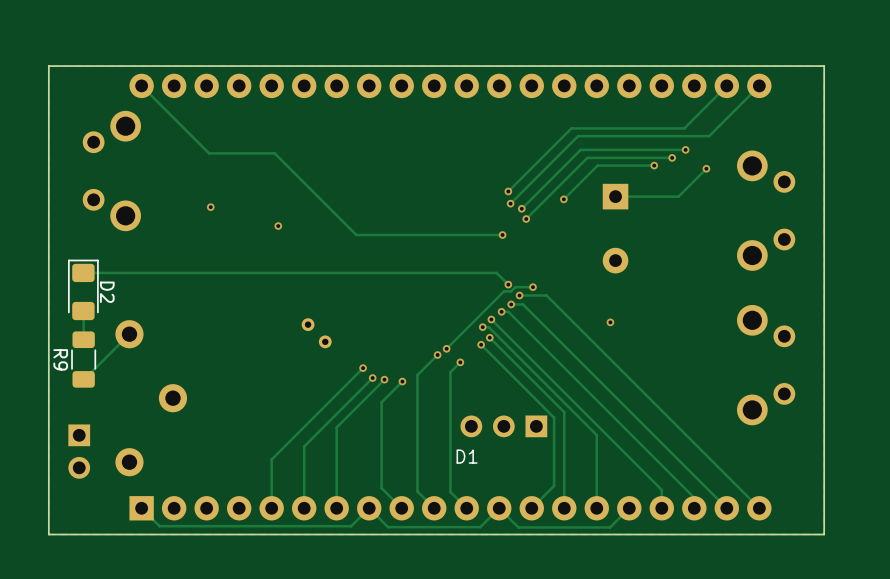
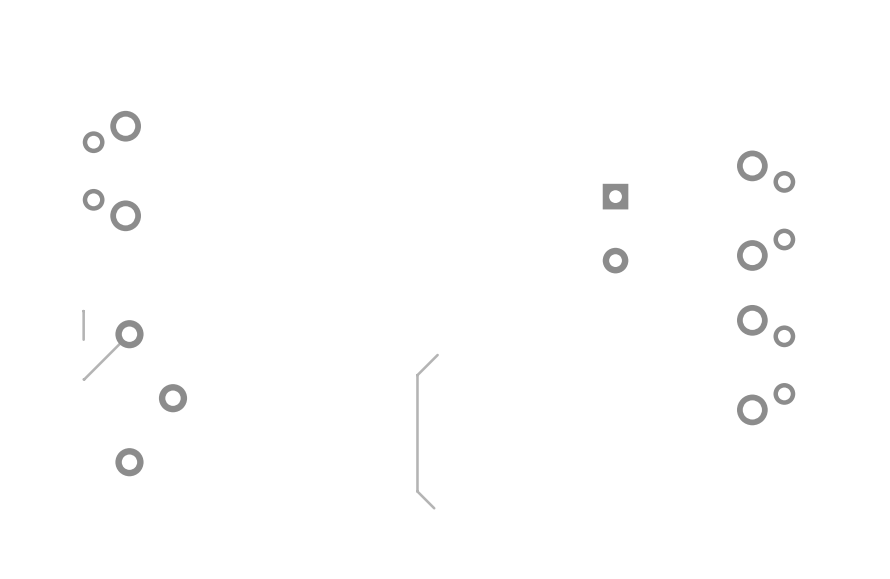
board edge: (824, 66) (48, 66) (48, 534) (824, 534) (824, 66) -> none
track: (141, 85) (209, 153) (274, 153) (356, 235) (502, 235) -> none
track: (726, 85) (684, 128) (571, 128) (508, 191) -> none
track: (759, 85) (709, 136) (578, 136) (510, 203) -> none
track: (685, 149) (580, 149) (521, 208) -> none
via: (685, 149) -> none
track: (672, 157) (587, 157) (526, 219) -> none
via: (672, 157) -> none
track: (654, 165) (597, 165) (563, 199) -> none
via: (654, 165) -> none
track: (706, 168) (678, 196) (615, 196) -> none
via: (706, 168) -> none
via: (508, 191) -> none
via: (563, 199) -> none
via: (510, 203) -> none
via: (210, 207) -> none
via: (521, 208) -> none
via: (526, 219) -> none
via: (278, 226) -> none
via: (502, 235) -> none
track: (83, 272) (496, 272) (508, 284) -> none
via: (508, 284) -> none
track: (532, 287) (515, 287) (511, 291) (504, 291) (446, 348) -> none
via: (532, 287) -> none
D2: (83, 289) -> none
track: (519, 295) (546, 295) (759, 508) -> none
via: (519, 295) -> none
D1: (450, 297) -> none
track: (511, 304) (522, 304) (726, 508) -> none
via: (511, 304) -> none
track: (501, 311) (508, 311) (694, 497) (694, 508) -> none
via: (501, 311) -> none
track: (491, 319) (661, 489) (661, 508) -> none
via: (491, 319) -> none
via: (610, 322) -> none
track: (482, 327) (488, 327) (596, 435) (596, 508) -> none
via: (482, 327) -> none
part: (316, 333) -> none
track: (489, 337) (564, 412) (564, 508) -> none
via: (489, 337) -> none
track: (481, 344) (554, 417) (554, 485) (531, 508) (524, 500) -> none
via: (481, 344) -> none
via: (446, 348) -> none
via: (437, 355) -> none
R9: (83, 359) -> none
track: (460, 362) (450, 372) (450, 491) (466, 508) -> none
via: (460, 362) -> none
track: (363, 368) (271, 459) (271, 508) -> none
via: (363, 368) -> none
track: (372, 378) (304, 446) (304, 508) -> none
via: (372, 378) -> none
track: (384, 379) (336, 427) (336, 508) -> none
via: (384, 379) -> none
track: (402, 381) (381, 402) (381, 488) (401, 508) -> none
via: (402, 381) -> none
part: (503, 426) -> none
part: (79, 451) -> none
track: (629, 508) (610, 527) (518, 527) (499, 508) (480, 527) (388, 527) (369, 508) (351, 526) (159, 526) (141, 508) -> none

